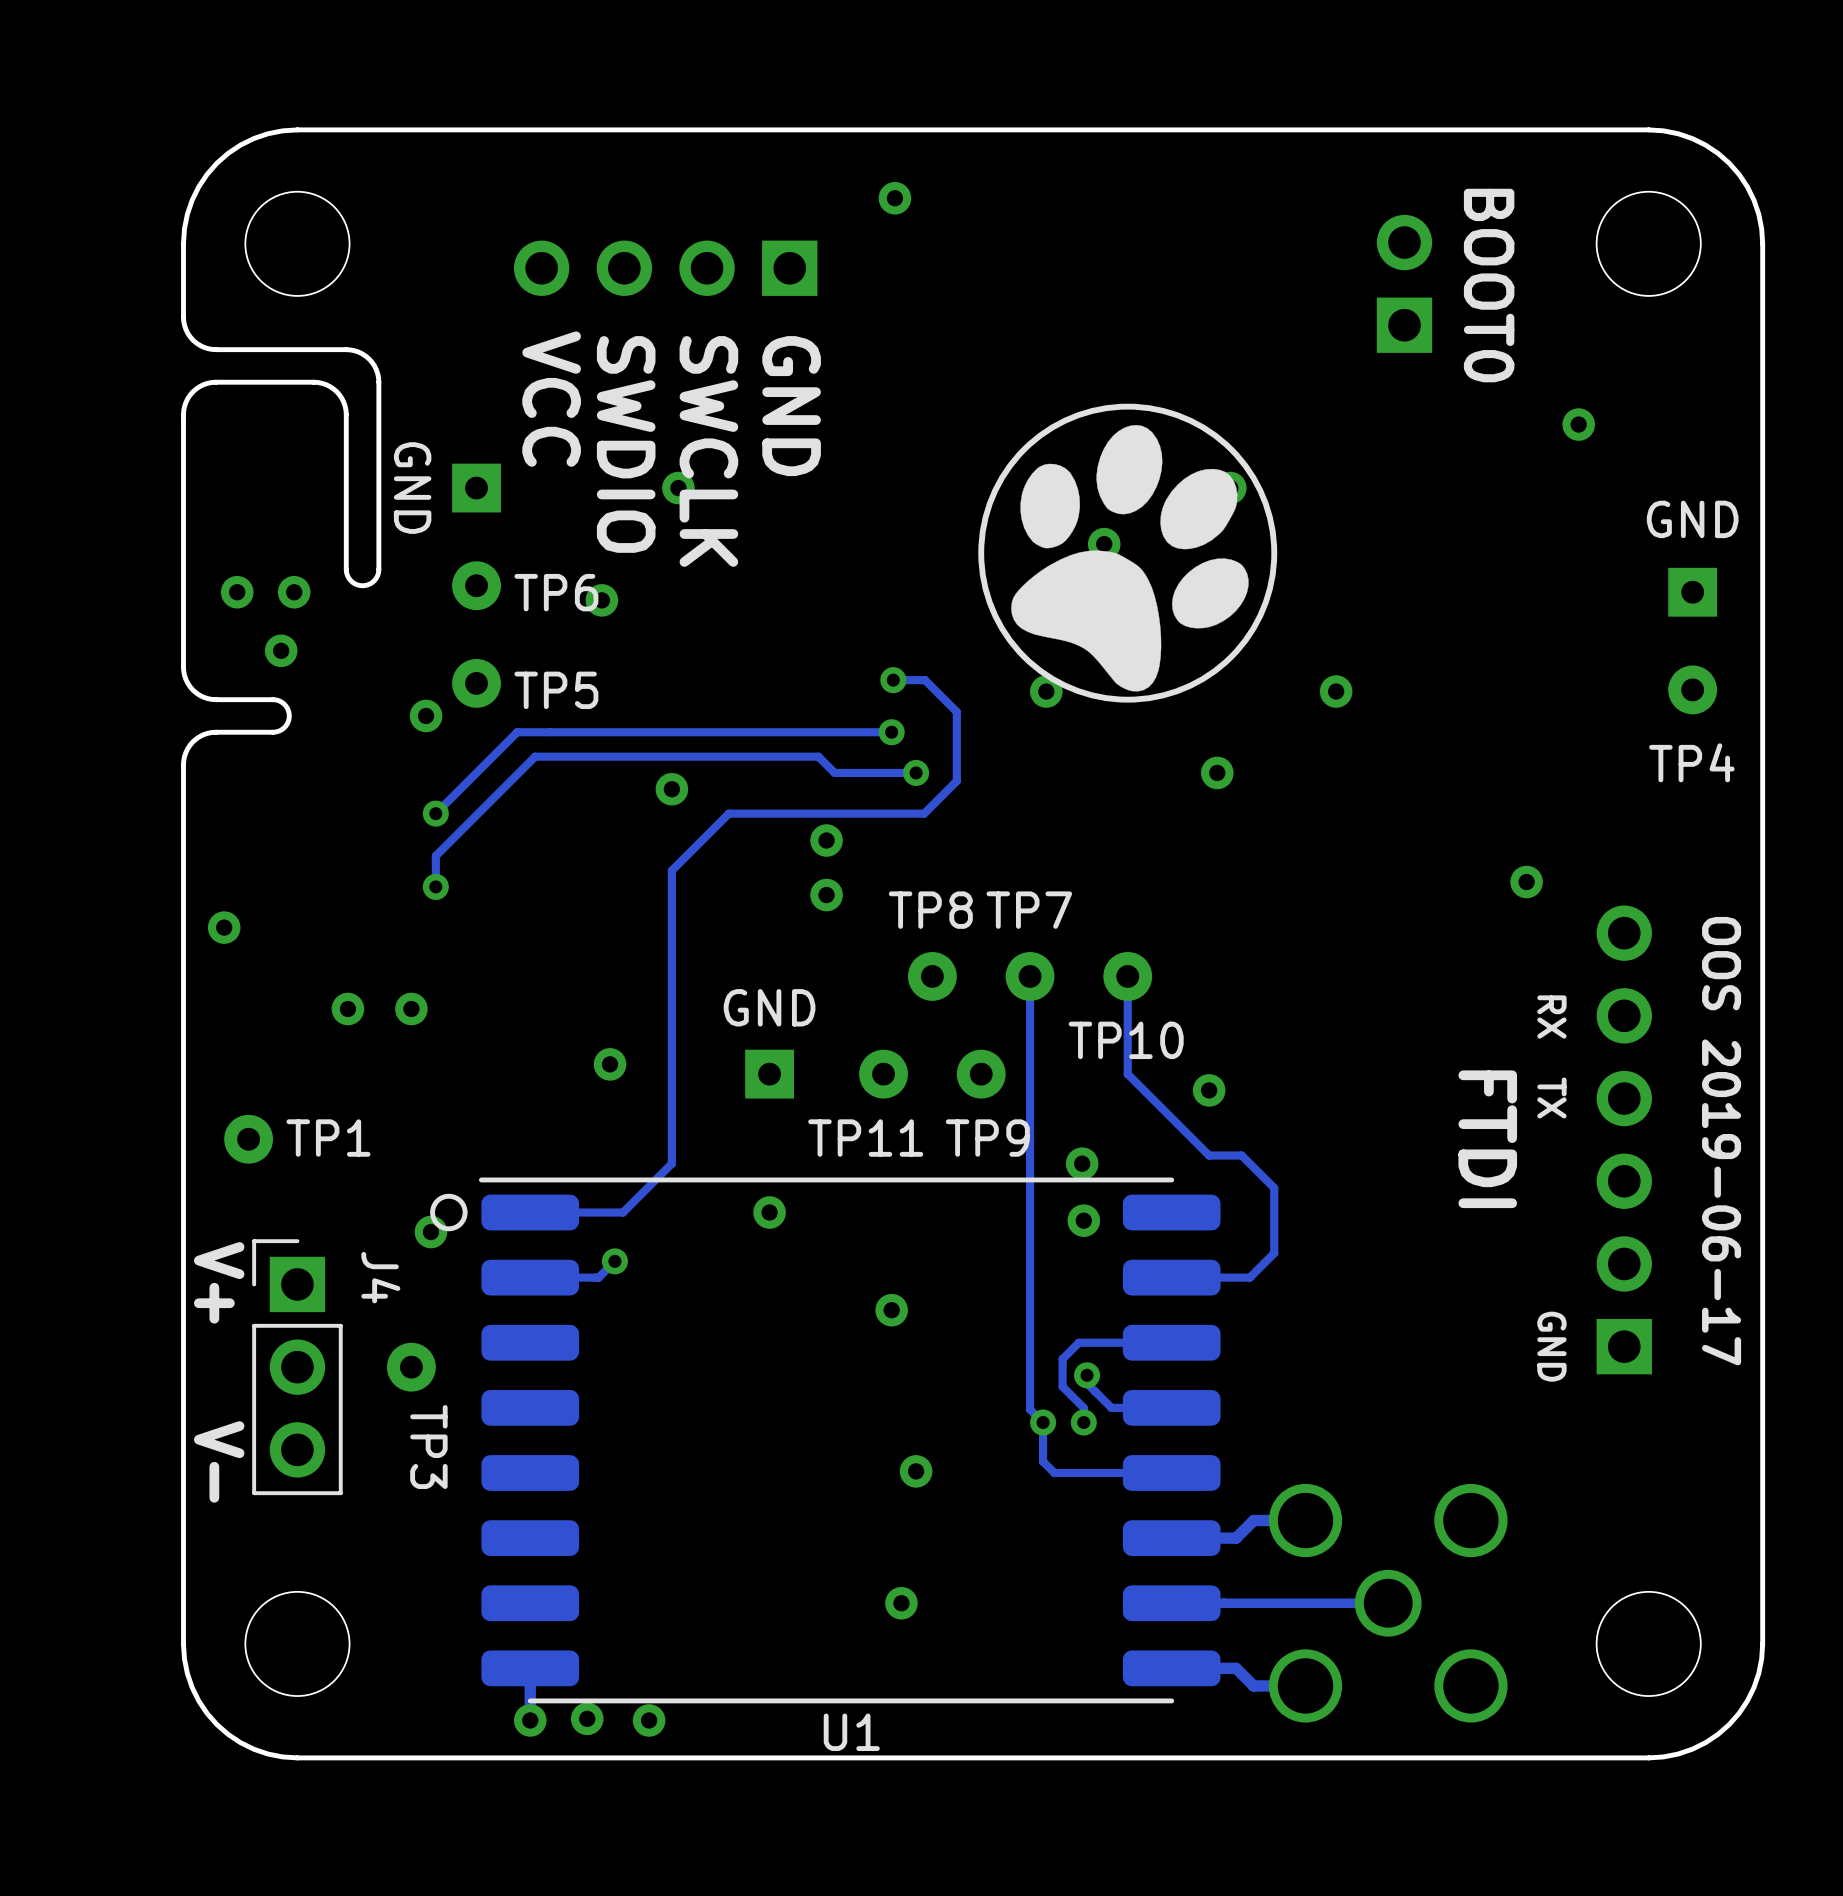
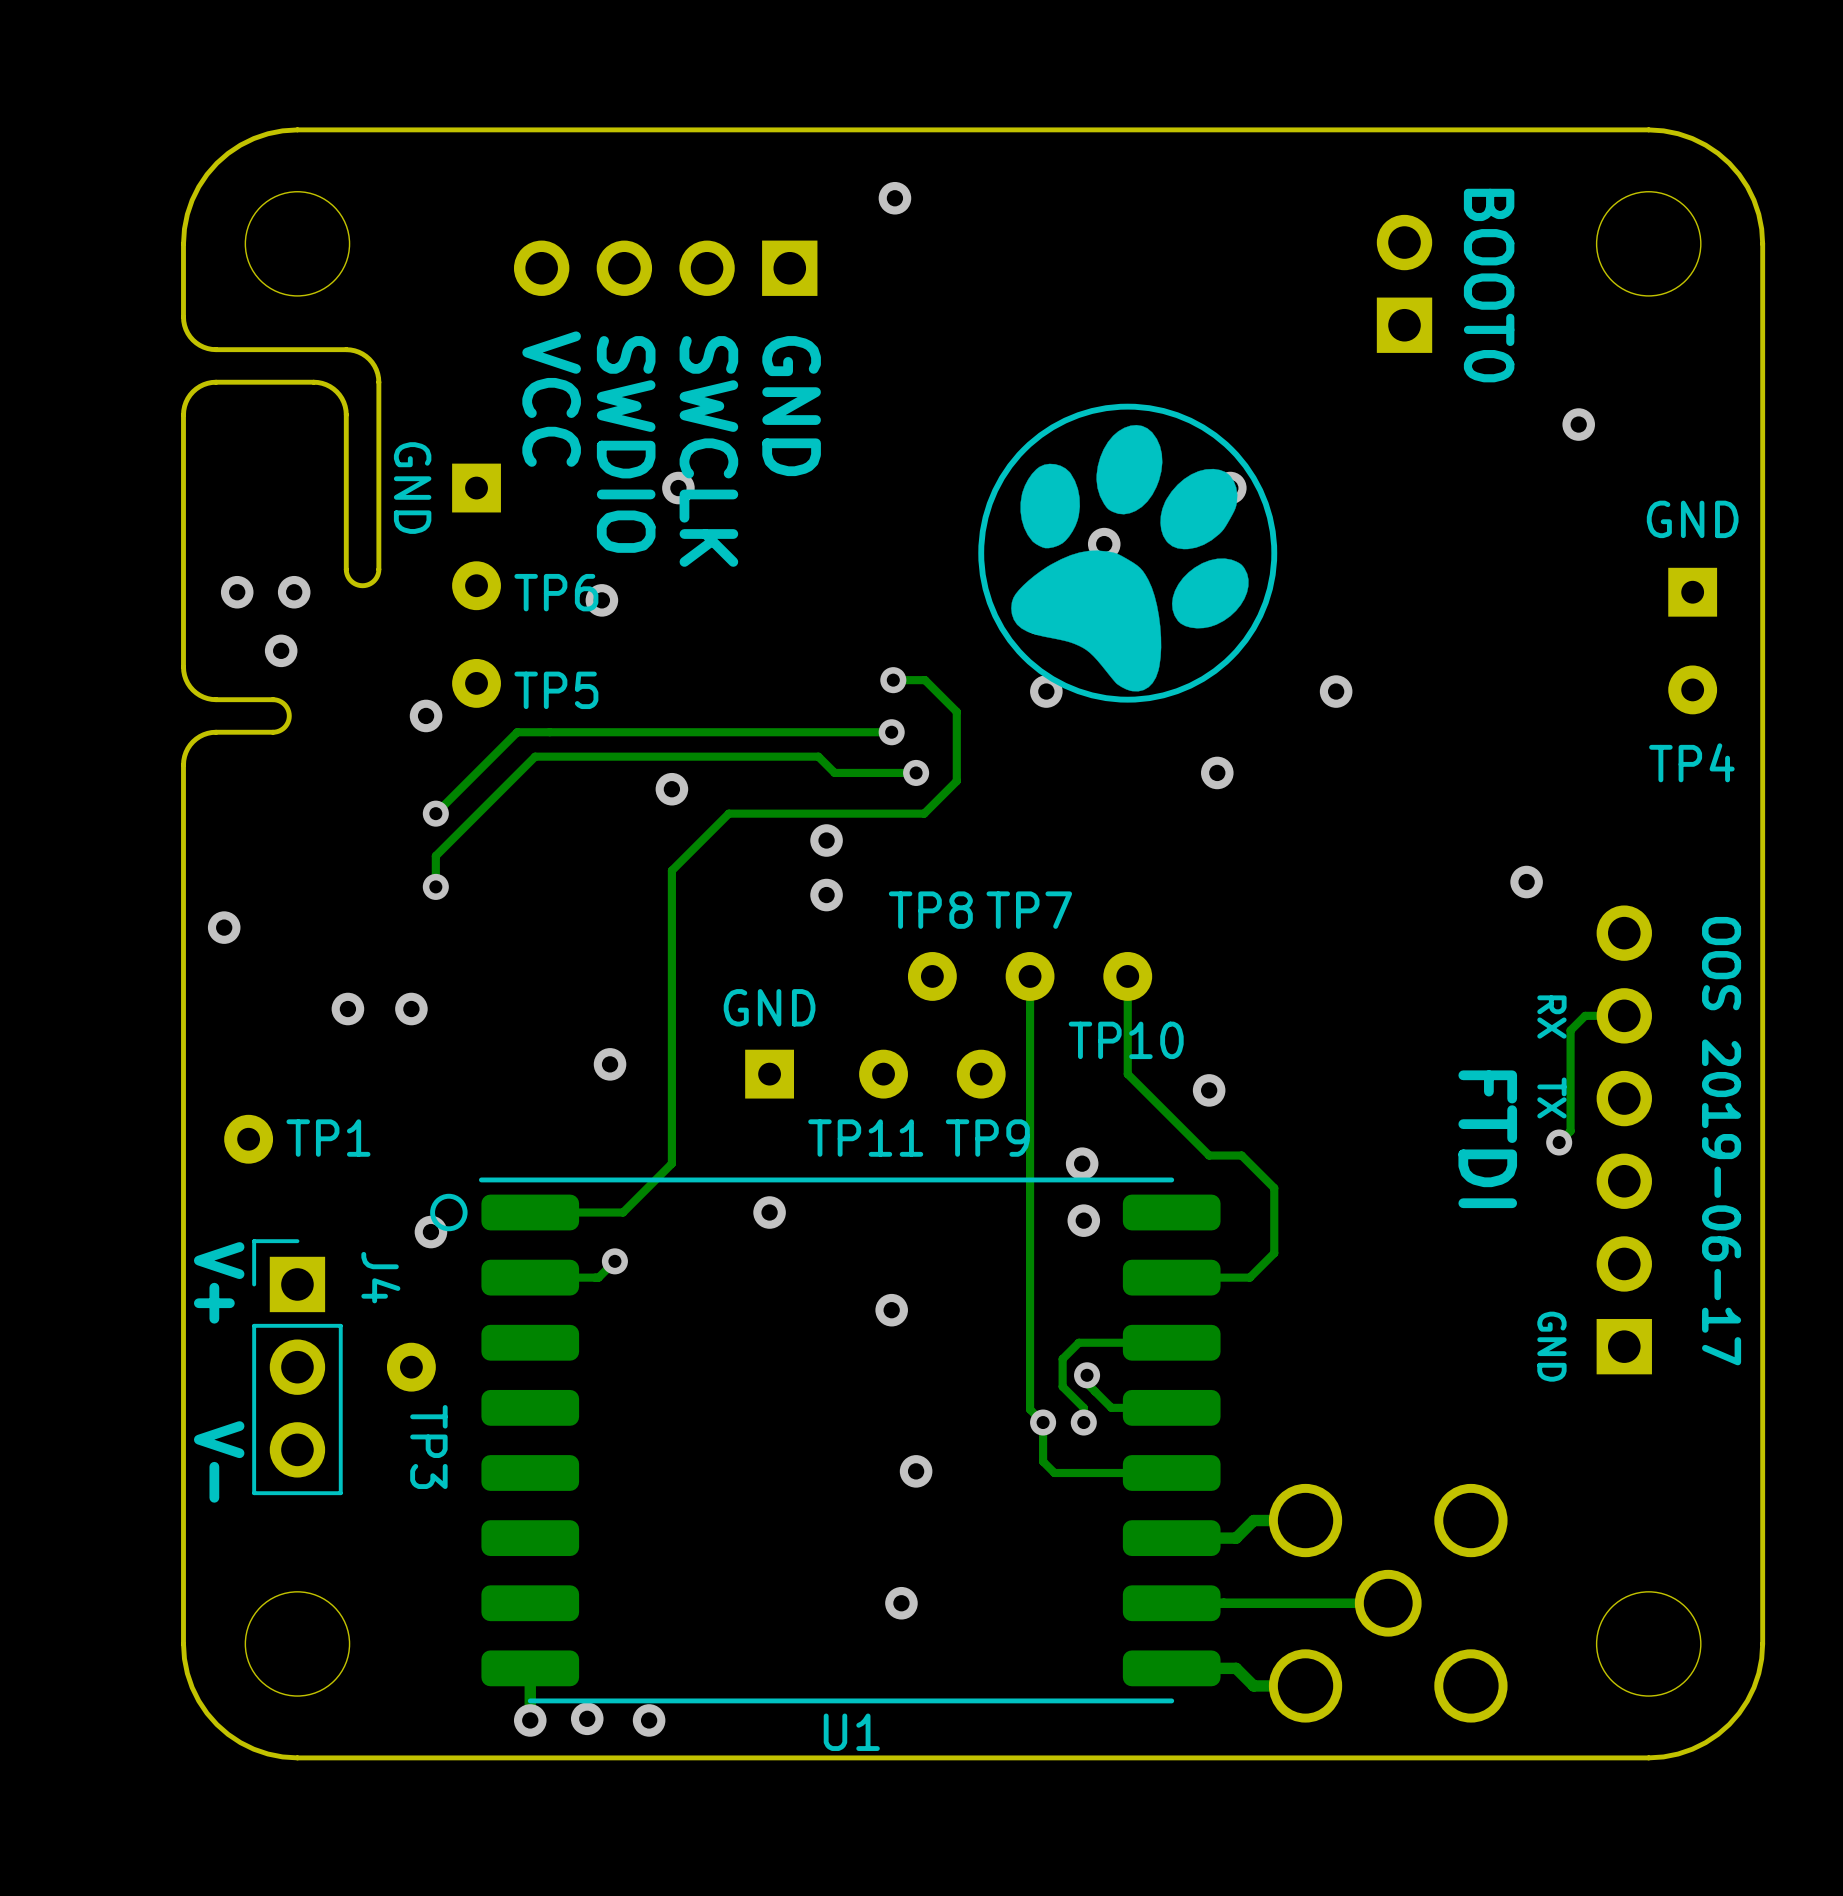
track: none -> (1624, 1015) (1585, 1015) (1570, 1030) (1570, 1131) (1559, 1142)
via: none -> (1559, 1142)

